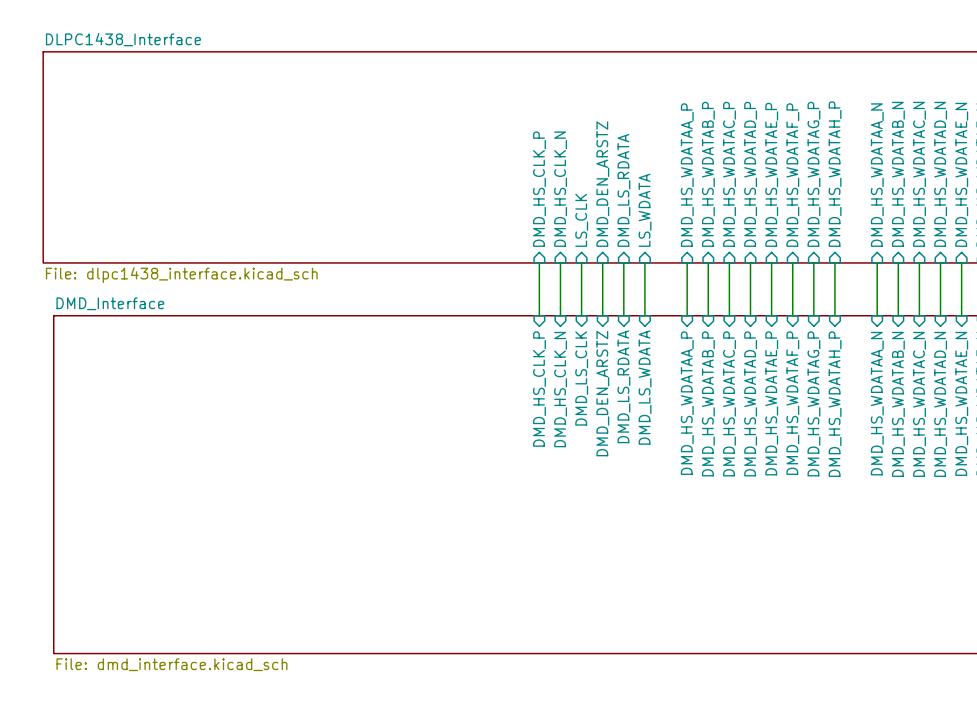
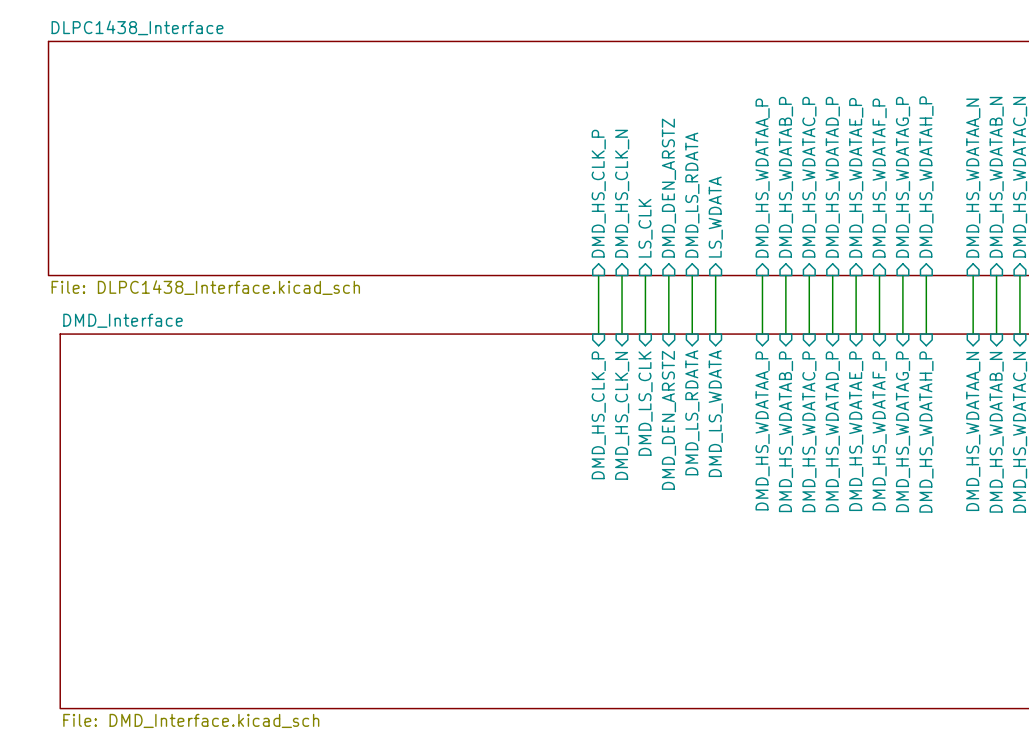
sheet DLPC1438_Interface value: File: dlpc1438_interface.kicad_sch (181, 275) -> File: DLPC1438_Interface.kicad_sch (205, 287)
sheet DMD_Interface value: File: dmd_interface.kicad_sch (171, 664) -> File: DMD_Interface.kicad_sch (191, 720)

